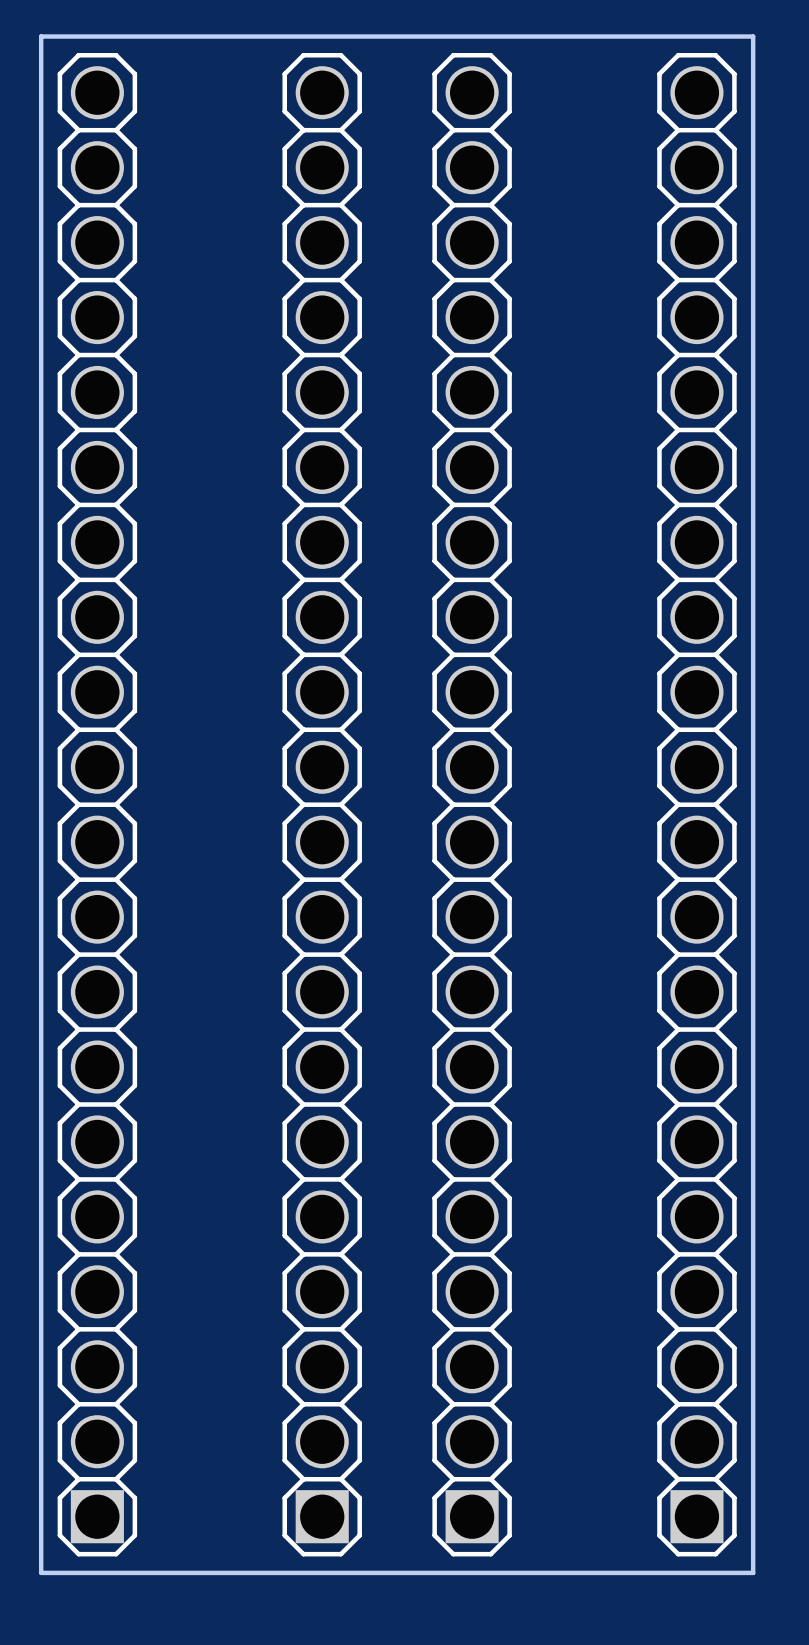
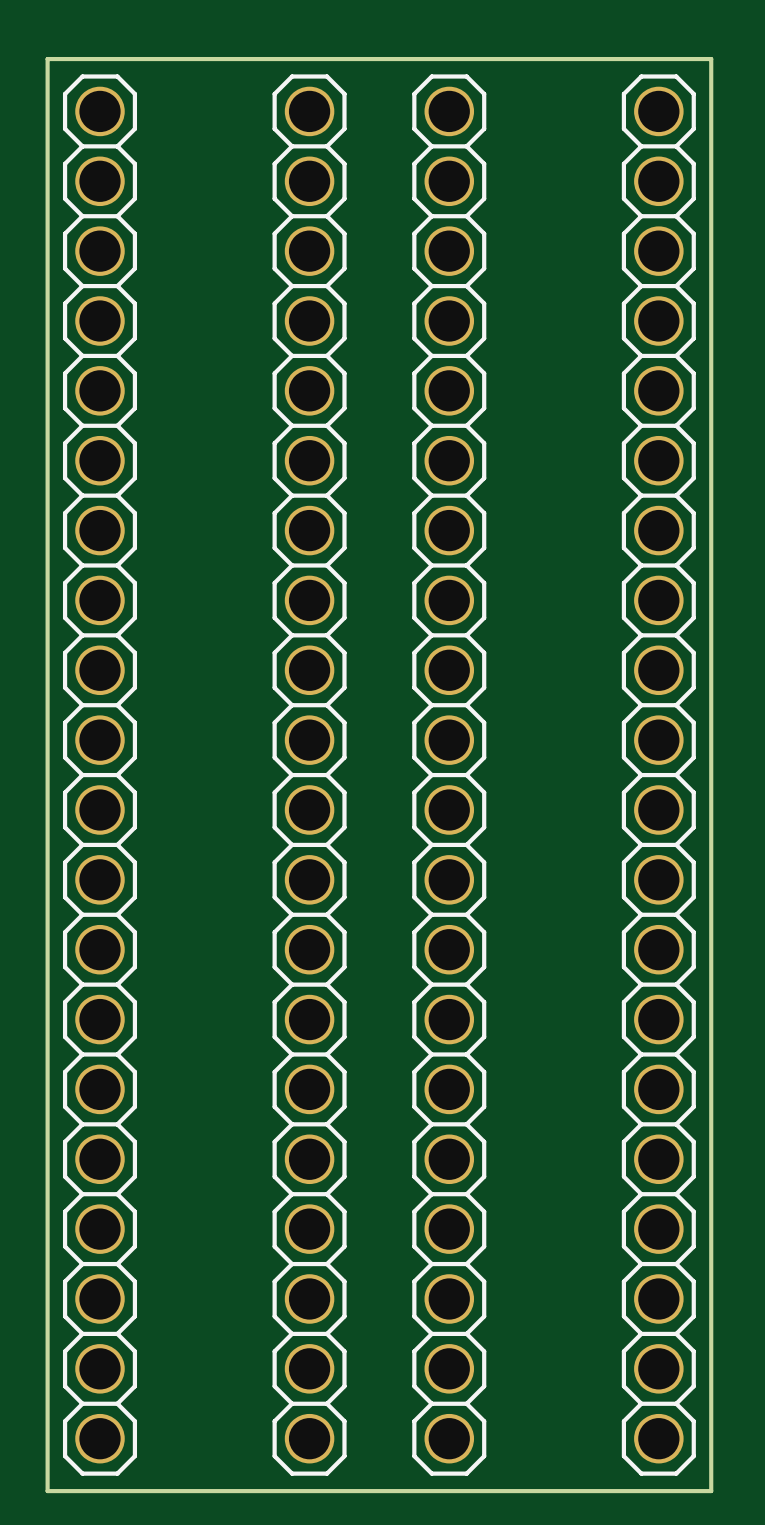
part footprint: [57, 53, 138, 1557] -> [62, 74, 138, 1476]
part footprint: [282, 53, 362, 1557] -> [272, 74, 347, 1476]
part footprint: [432, 53, 512, 1557] -> [412, 74, 487, 1476]
part footprint: [657, 53, 737, 1557] -> [621, 74, 696, 1476]

